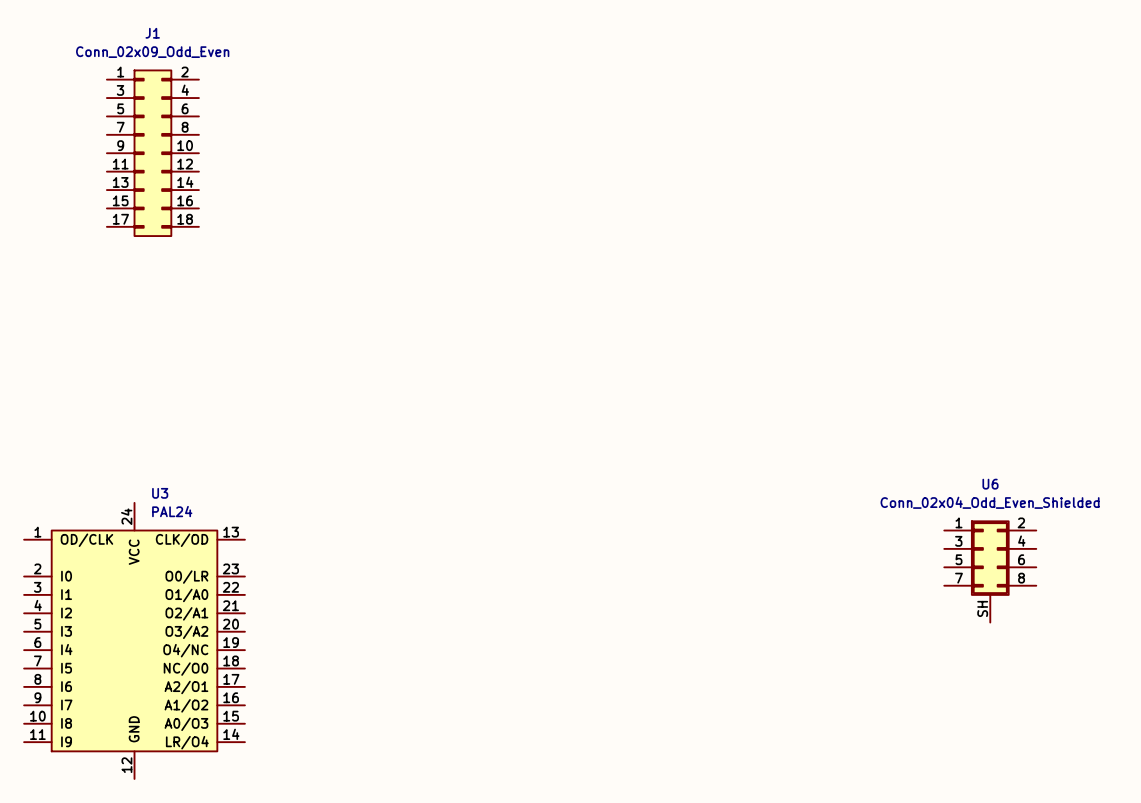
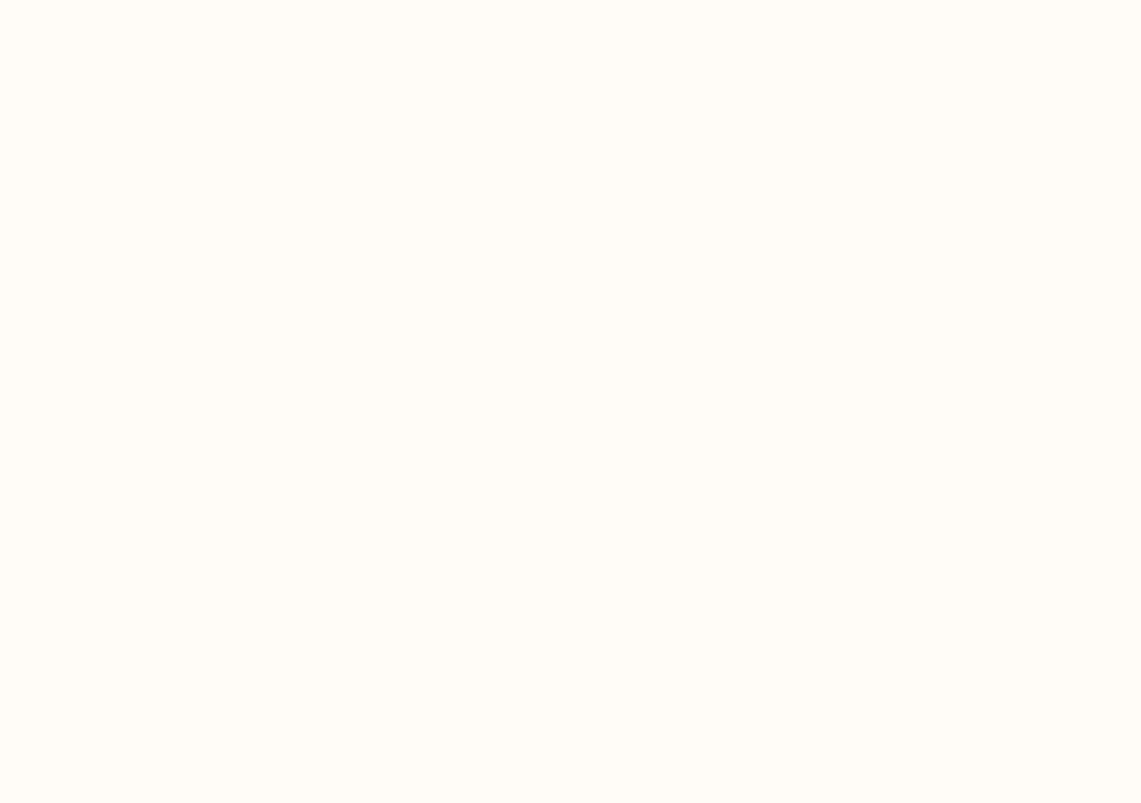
J1: Conn_02x09_Odd_Even (152, 153) -> none
U6: Conn_02x04_Odd_Even_Shielded (990, 571) -> none
U3: PAL24 (134, 640) -> none

